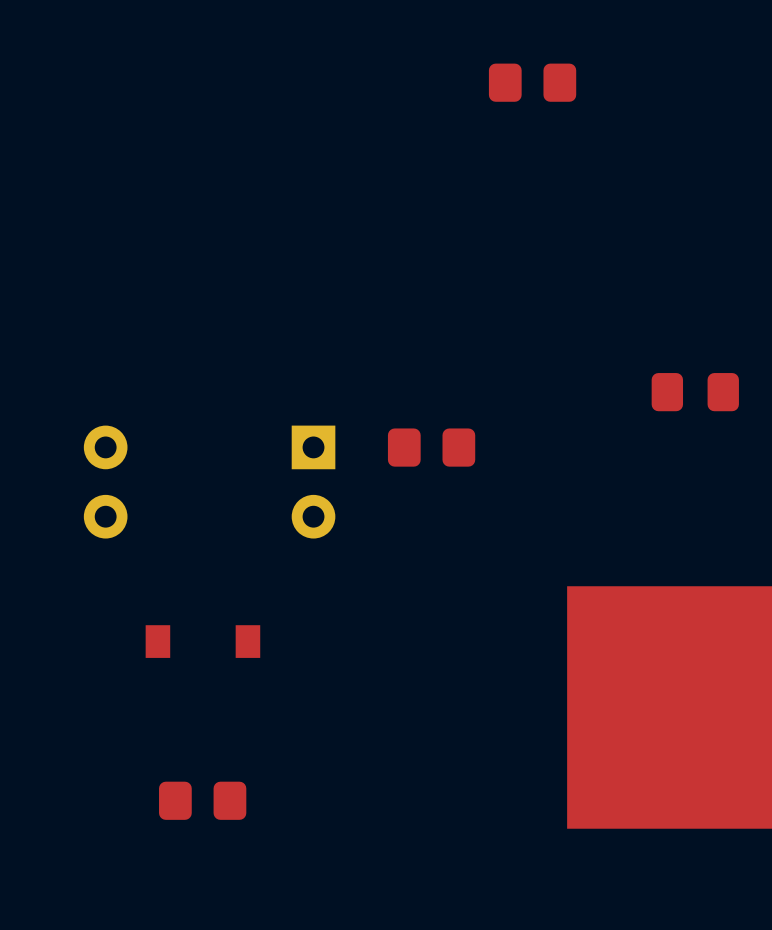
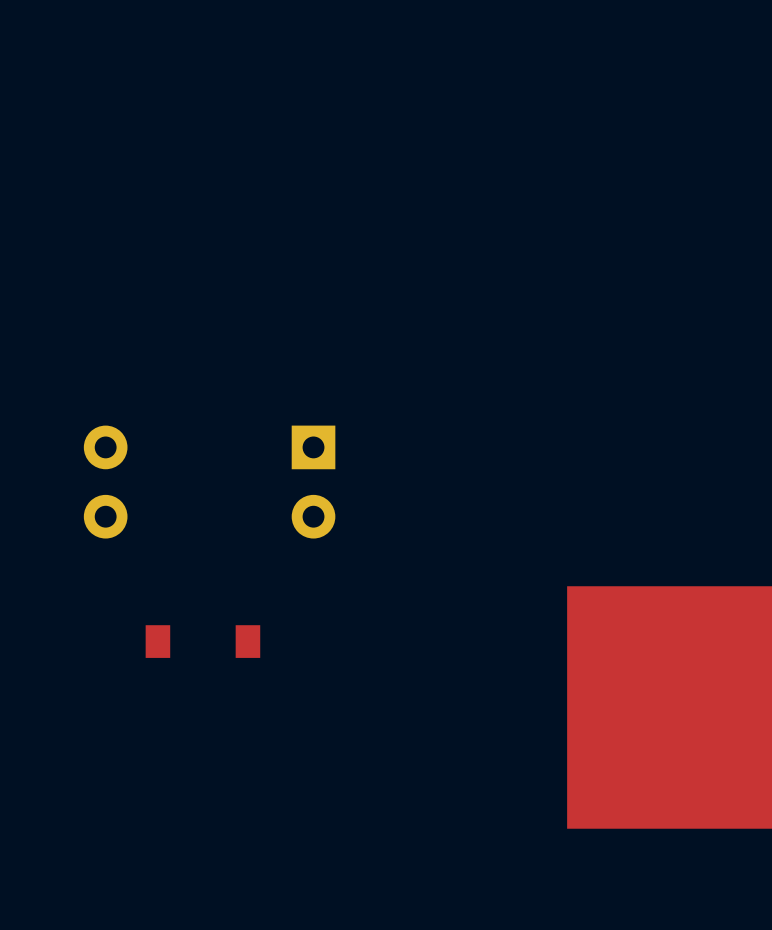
part: (532, 82) -> none
part: (695, 392) -> none
part: (431, 447) -> none
part: (202, 800) -> none

